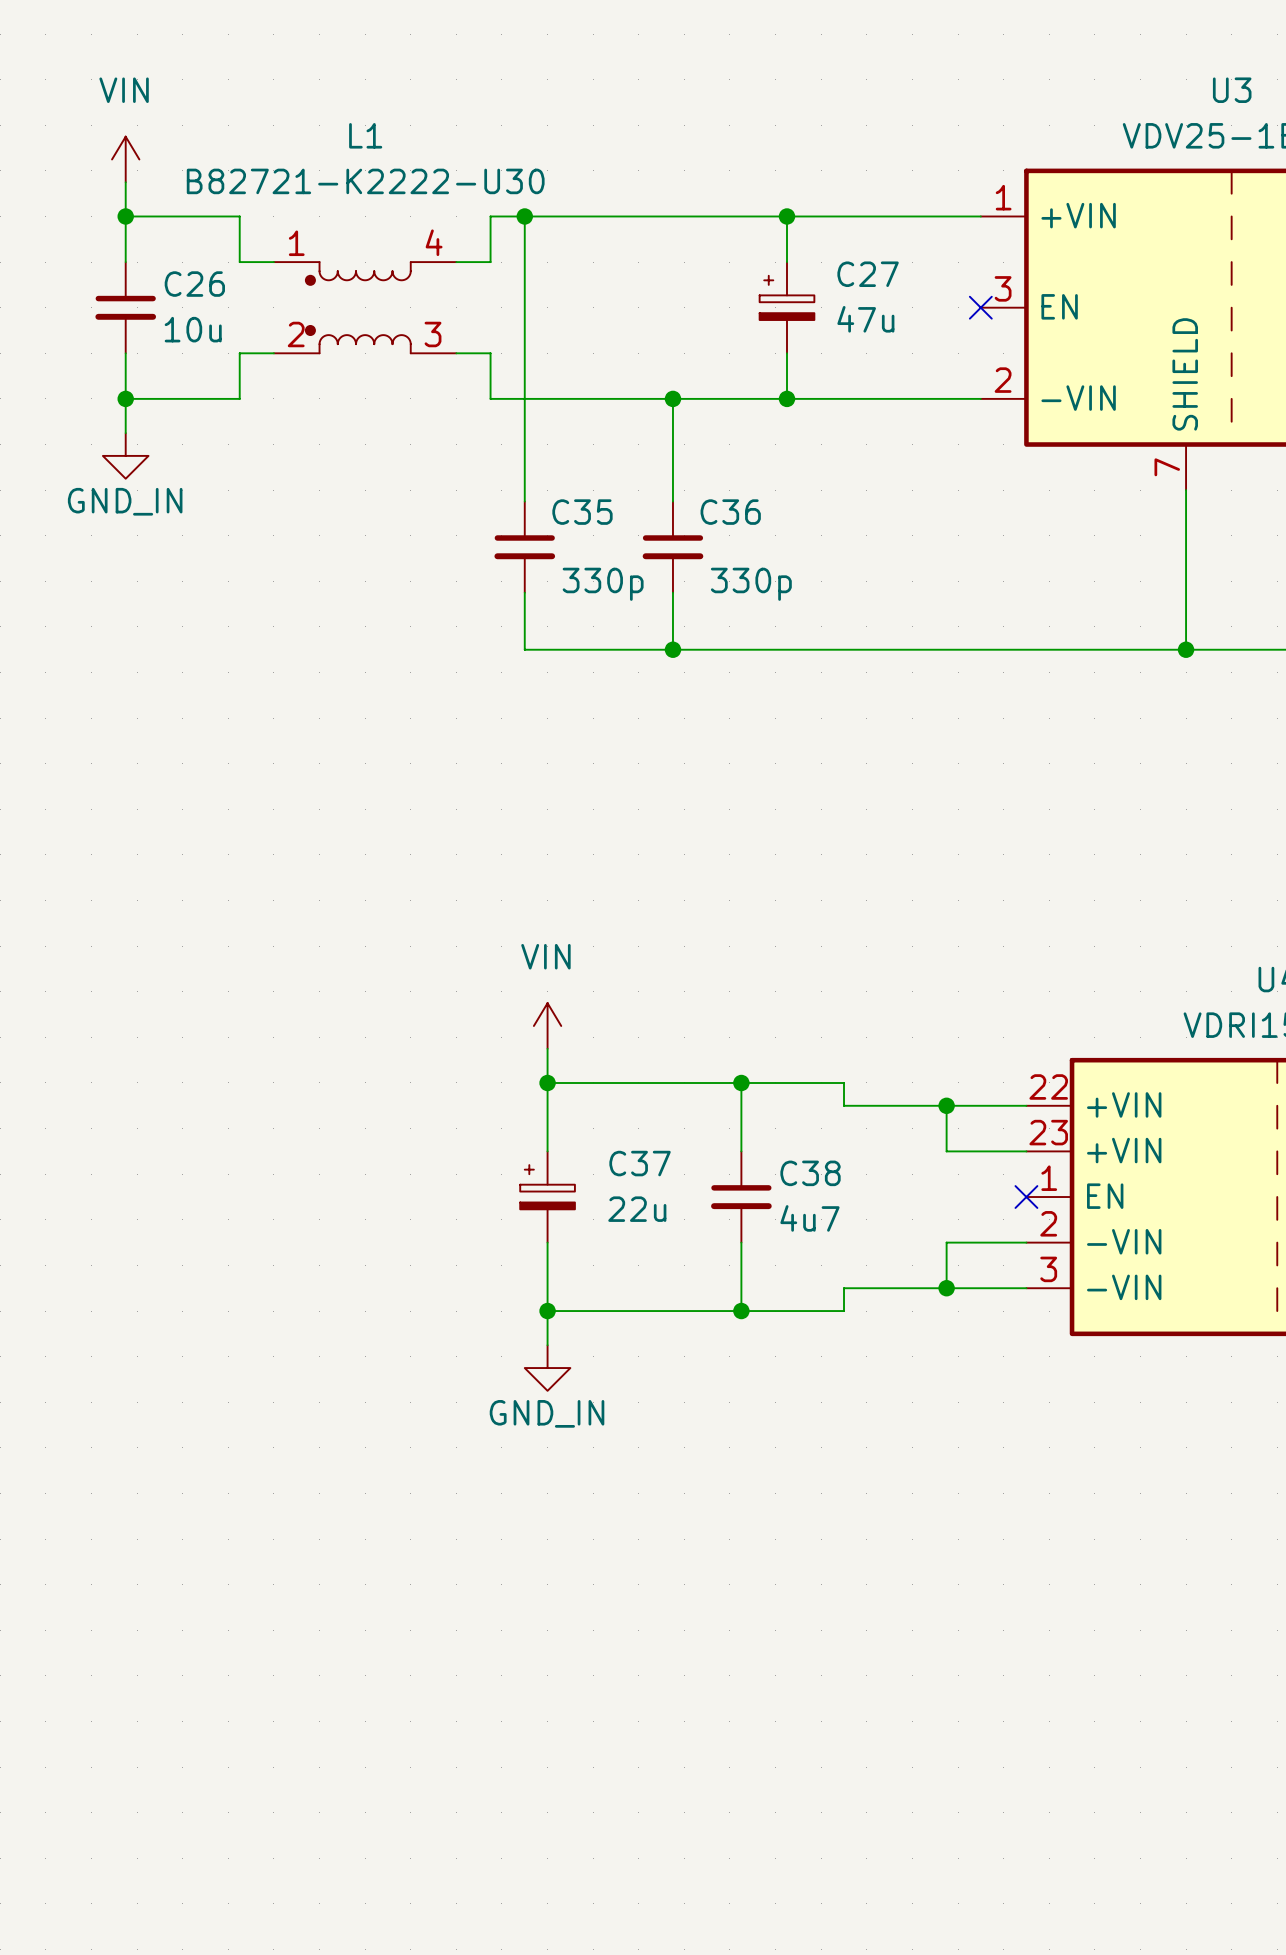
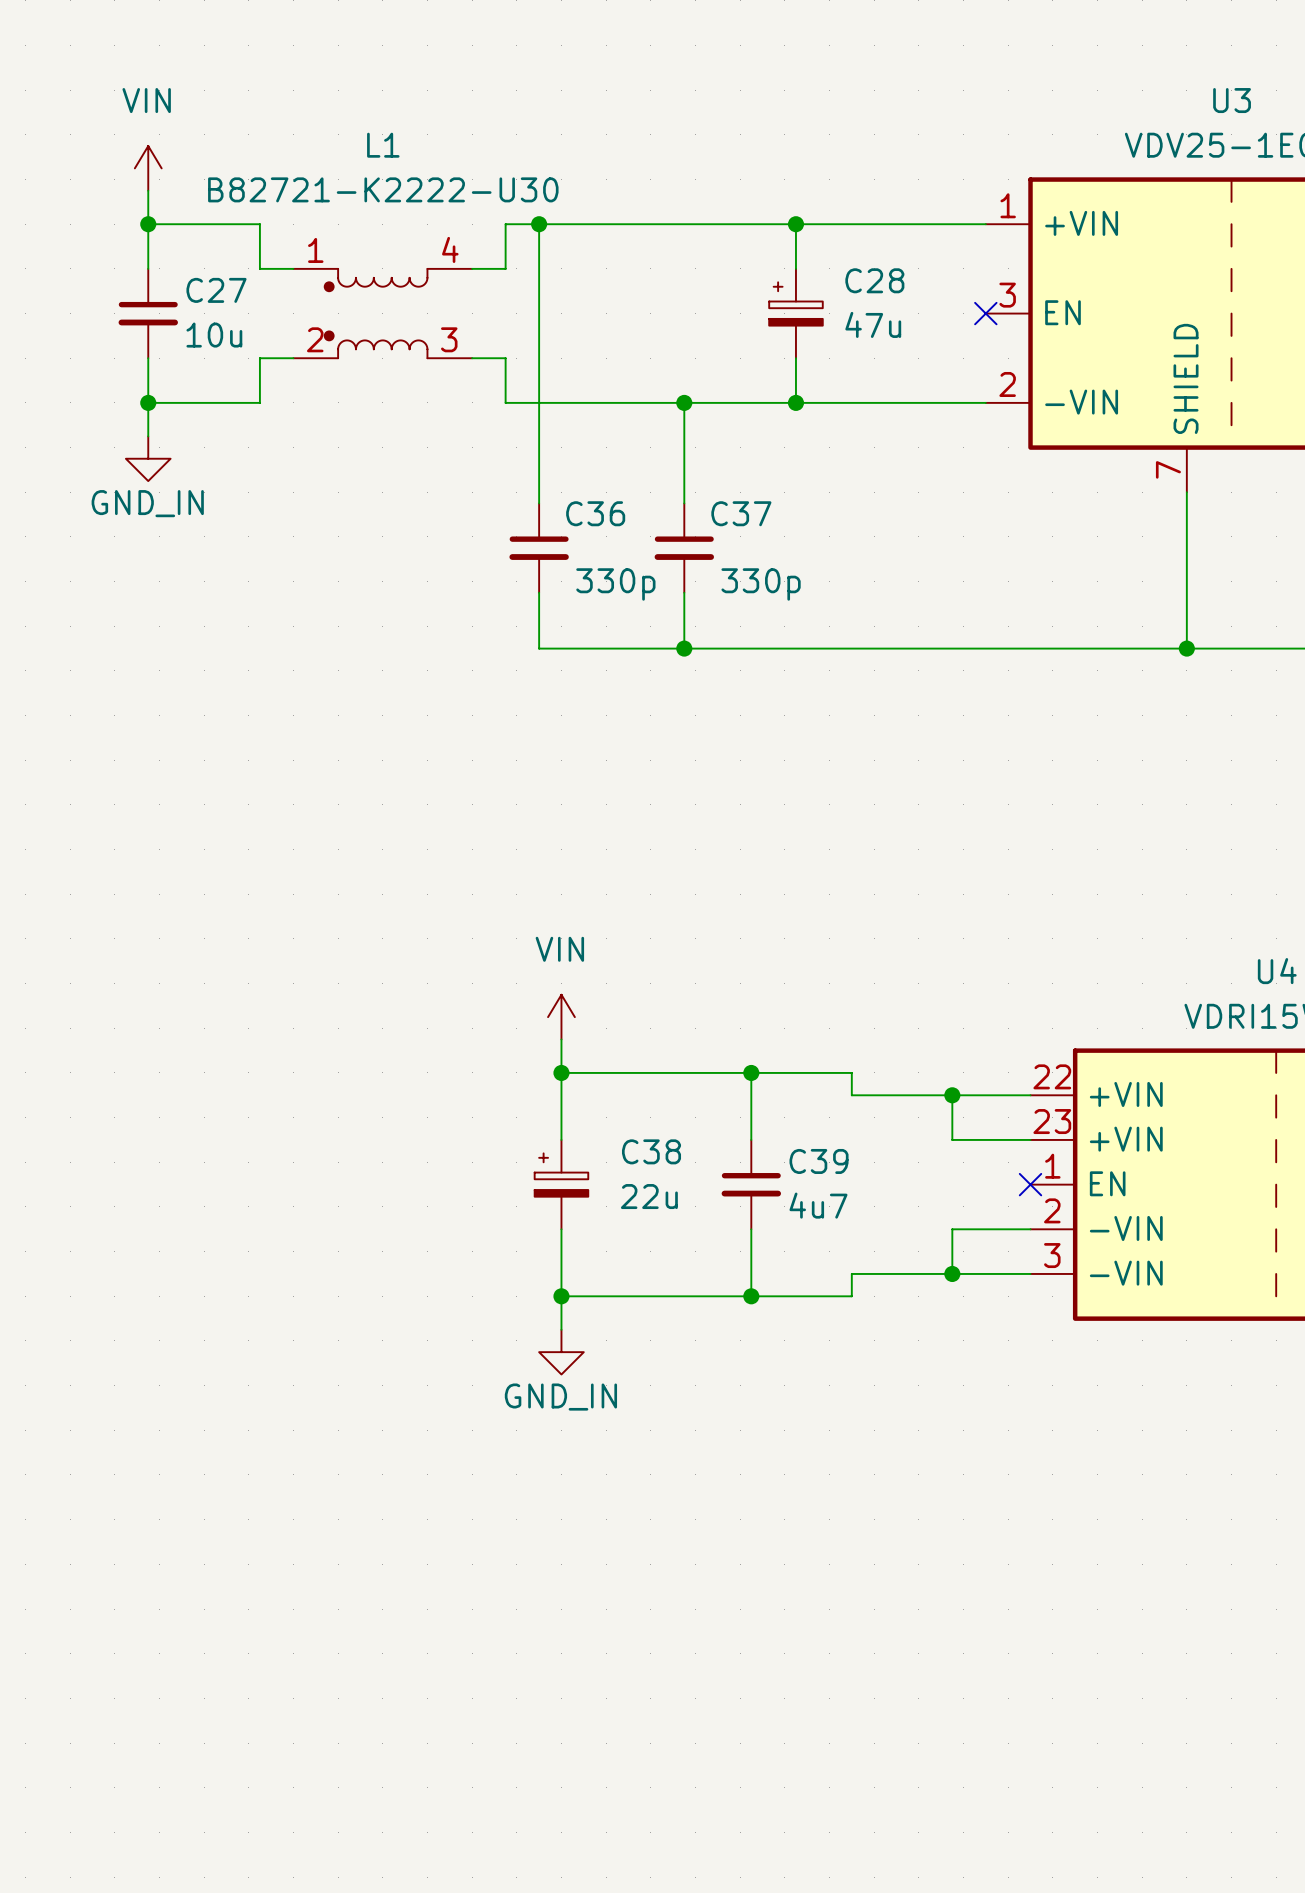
C27 name: C27 (868, 274) -> C28 (874, 280)
C26 name: C26 (194, 284) -> C27 (216, 290)
C35 name: C35 (582, 512) -> C36 (595, 513)
C36 name: C36 (730, 512) -> C37 (741, 513)
C37 name: C37 (640, 1163) -> C38 (651, 1151)
C38 name: C38 (810, 1173) -> C39 (819, 1161)

